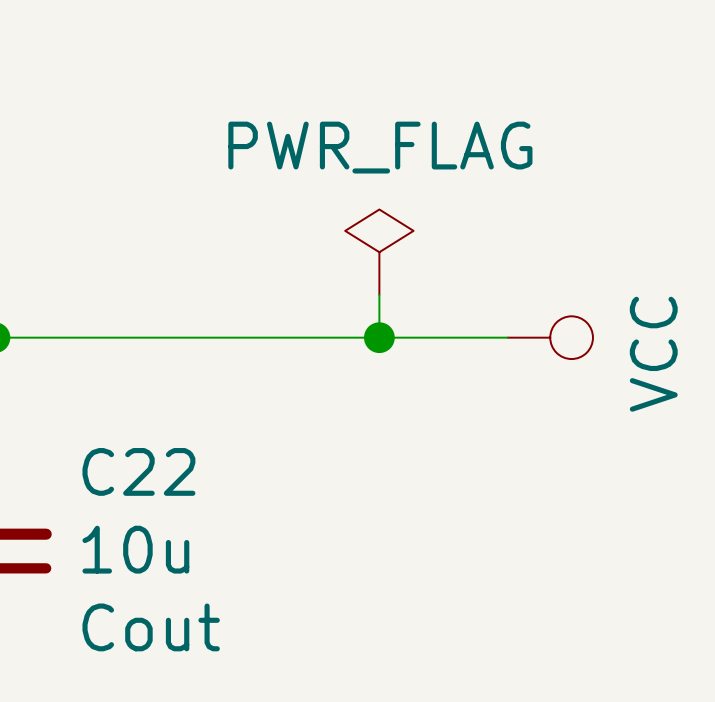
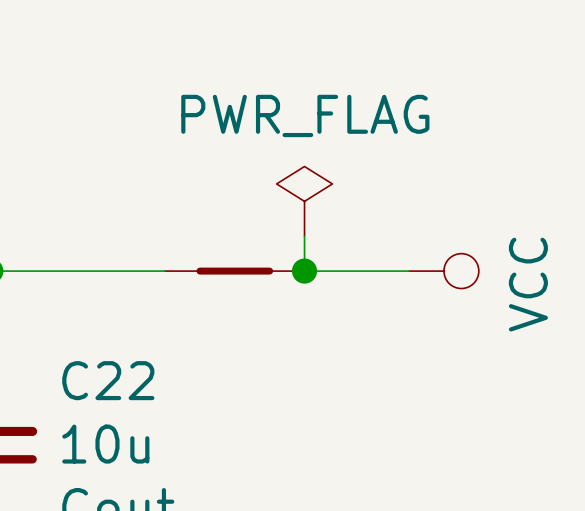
part: none -> (234, 271)

